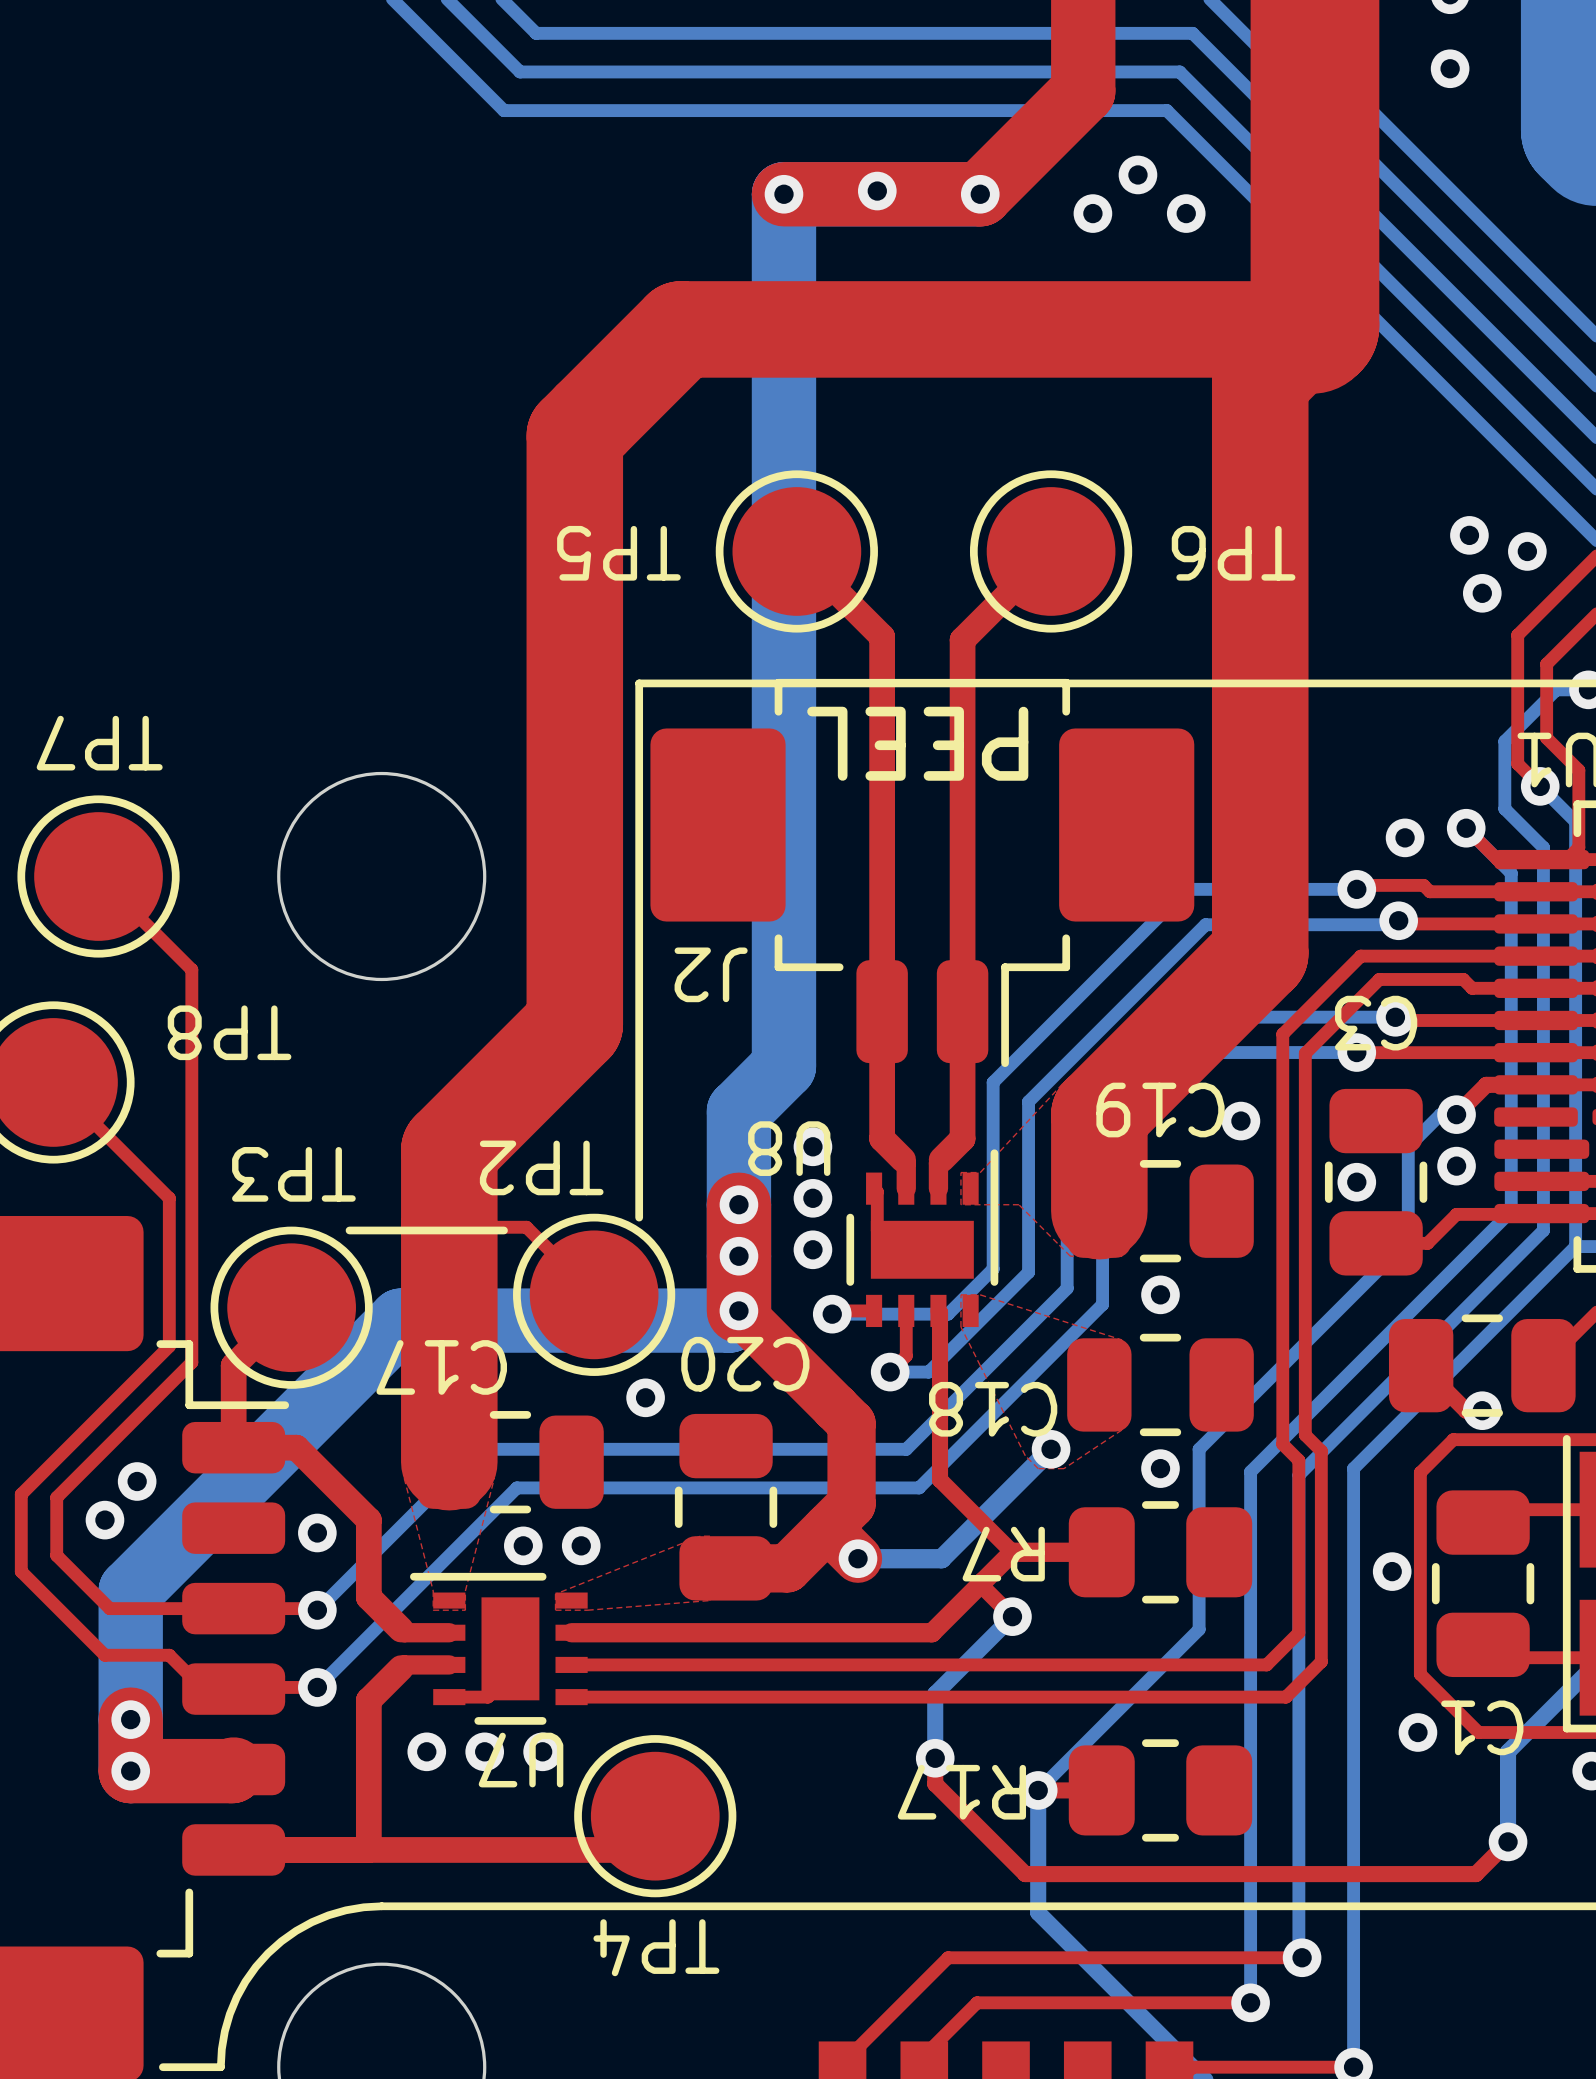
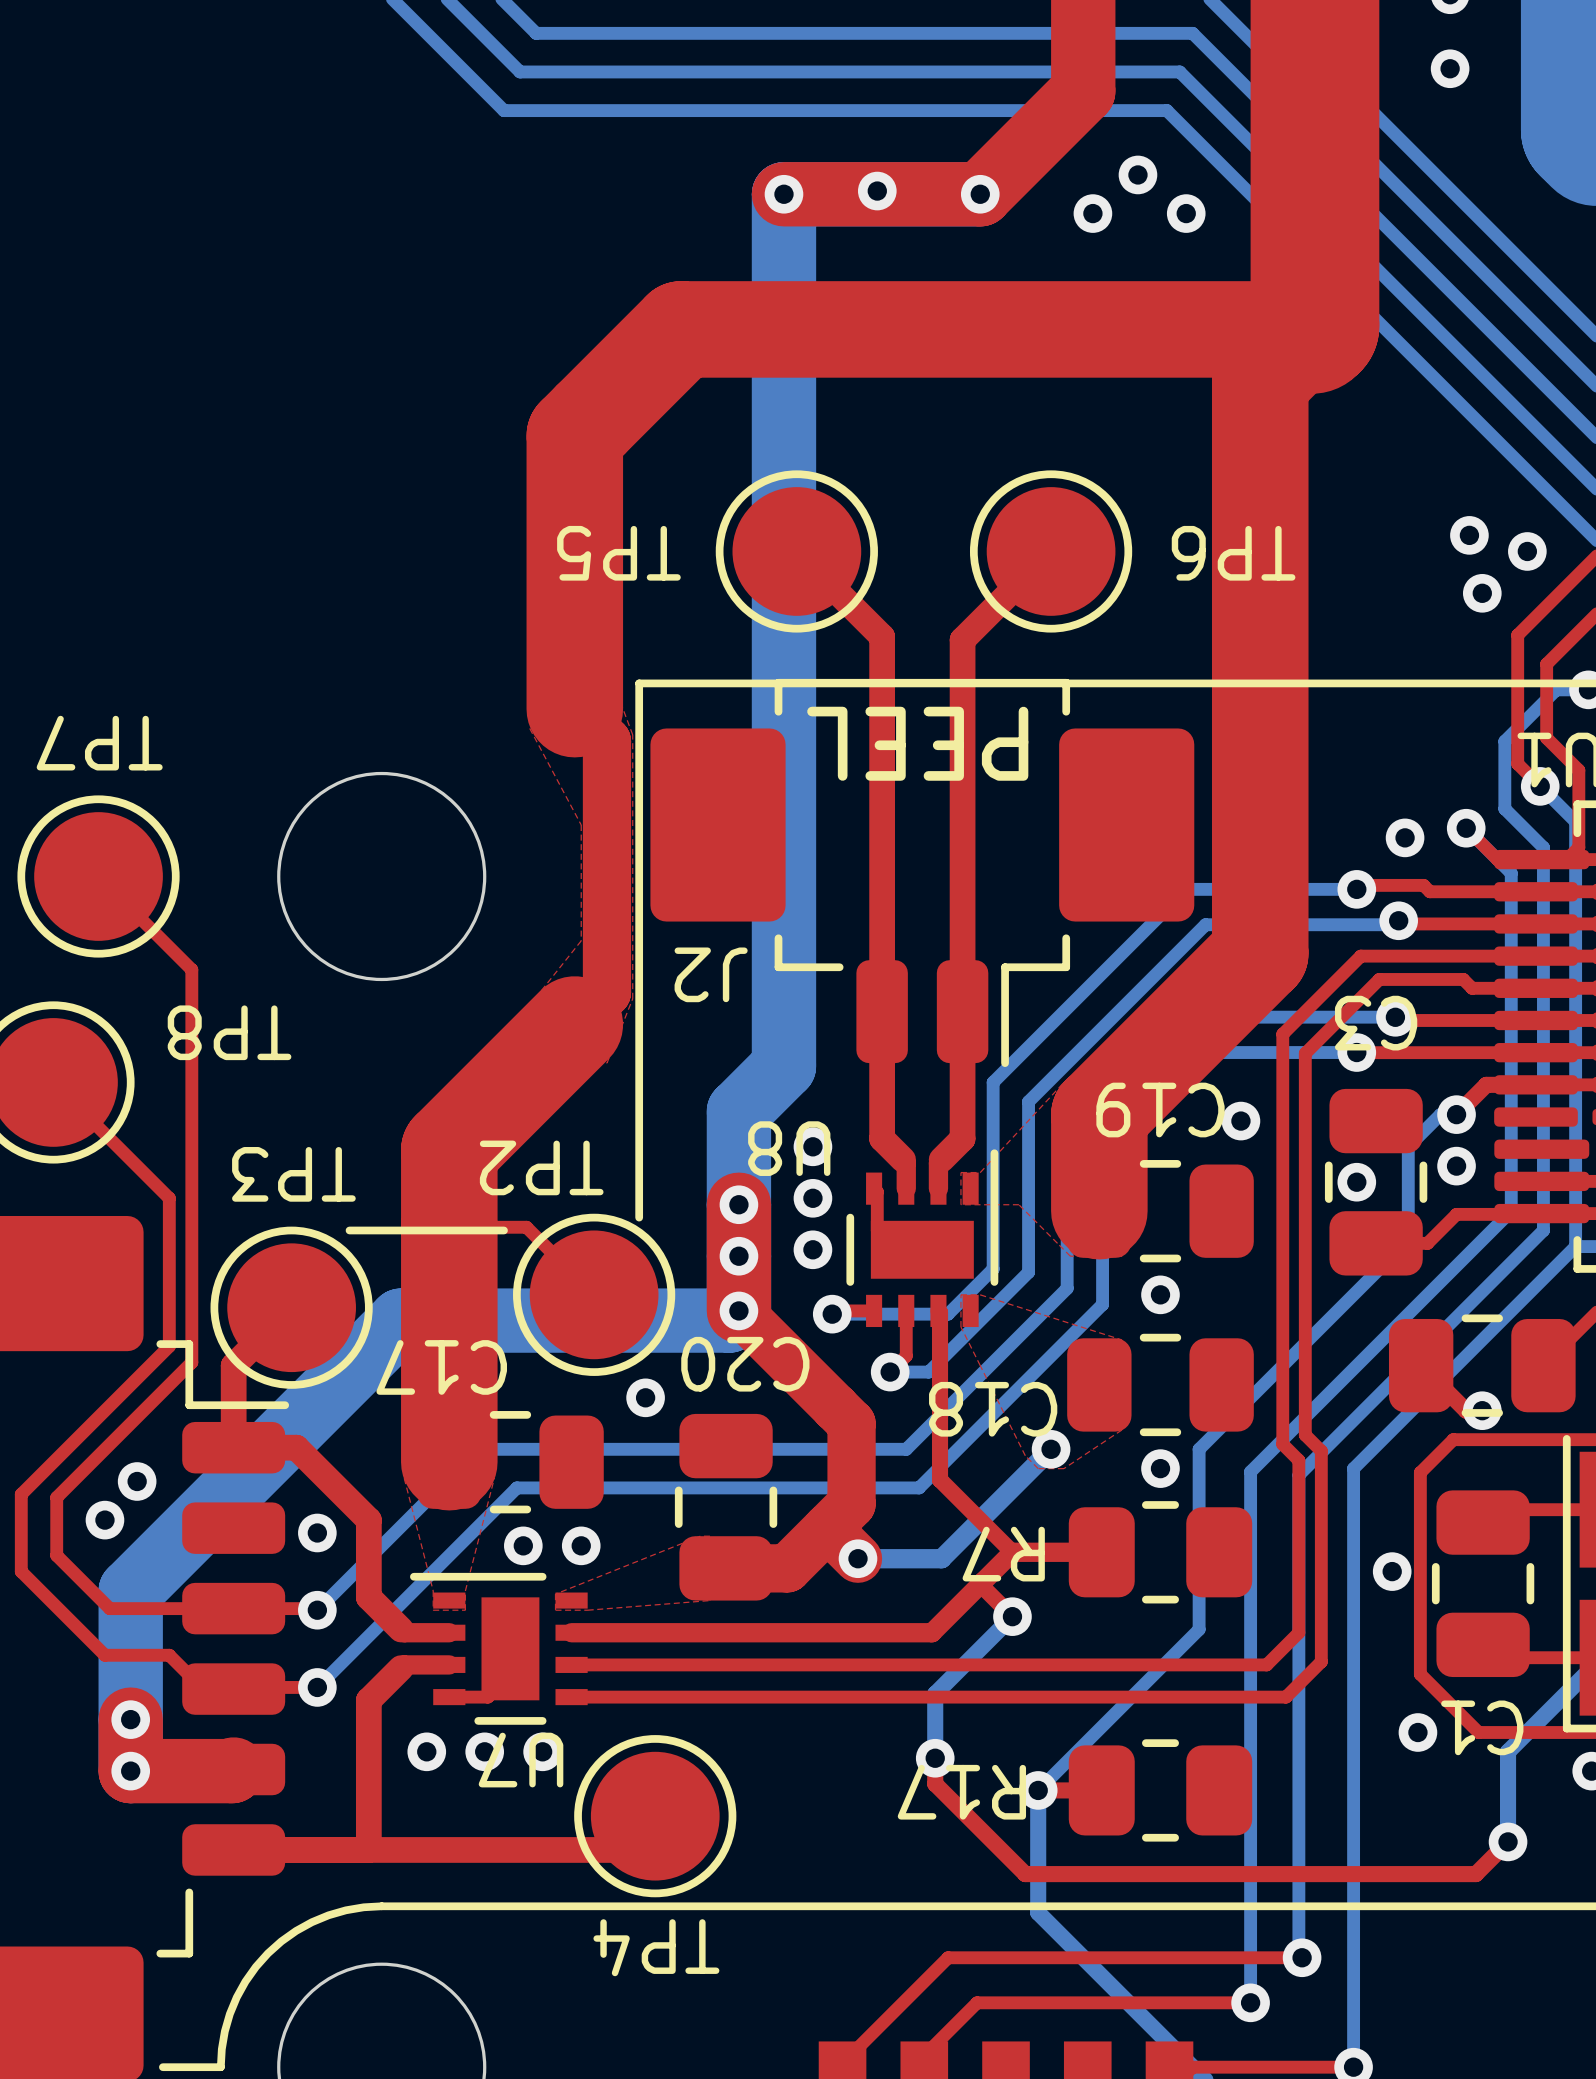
top zone outline: none -> (613, 683) (632, 734) (632, 998) (606, 1063) (529, 1005) (581, 940) (581, 825) (529, 728) (613, 683)
top track: (574, 709) (574, 1024) -> (574, 709) (606, 741) (606, 992) (574, 1024)

